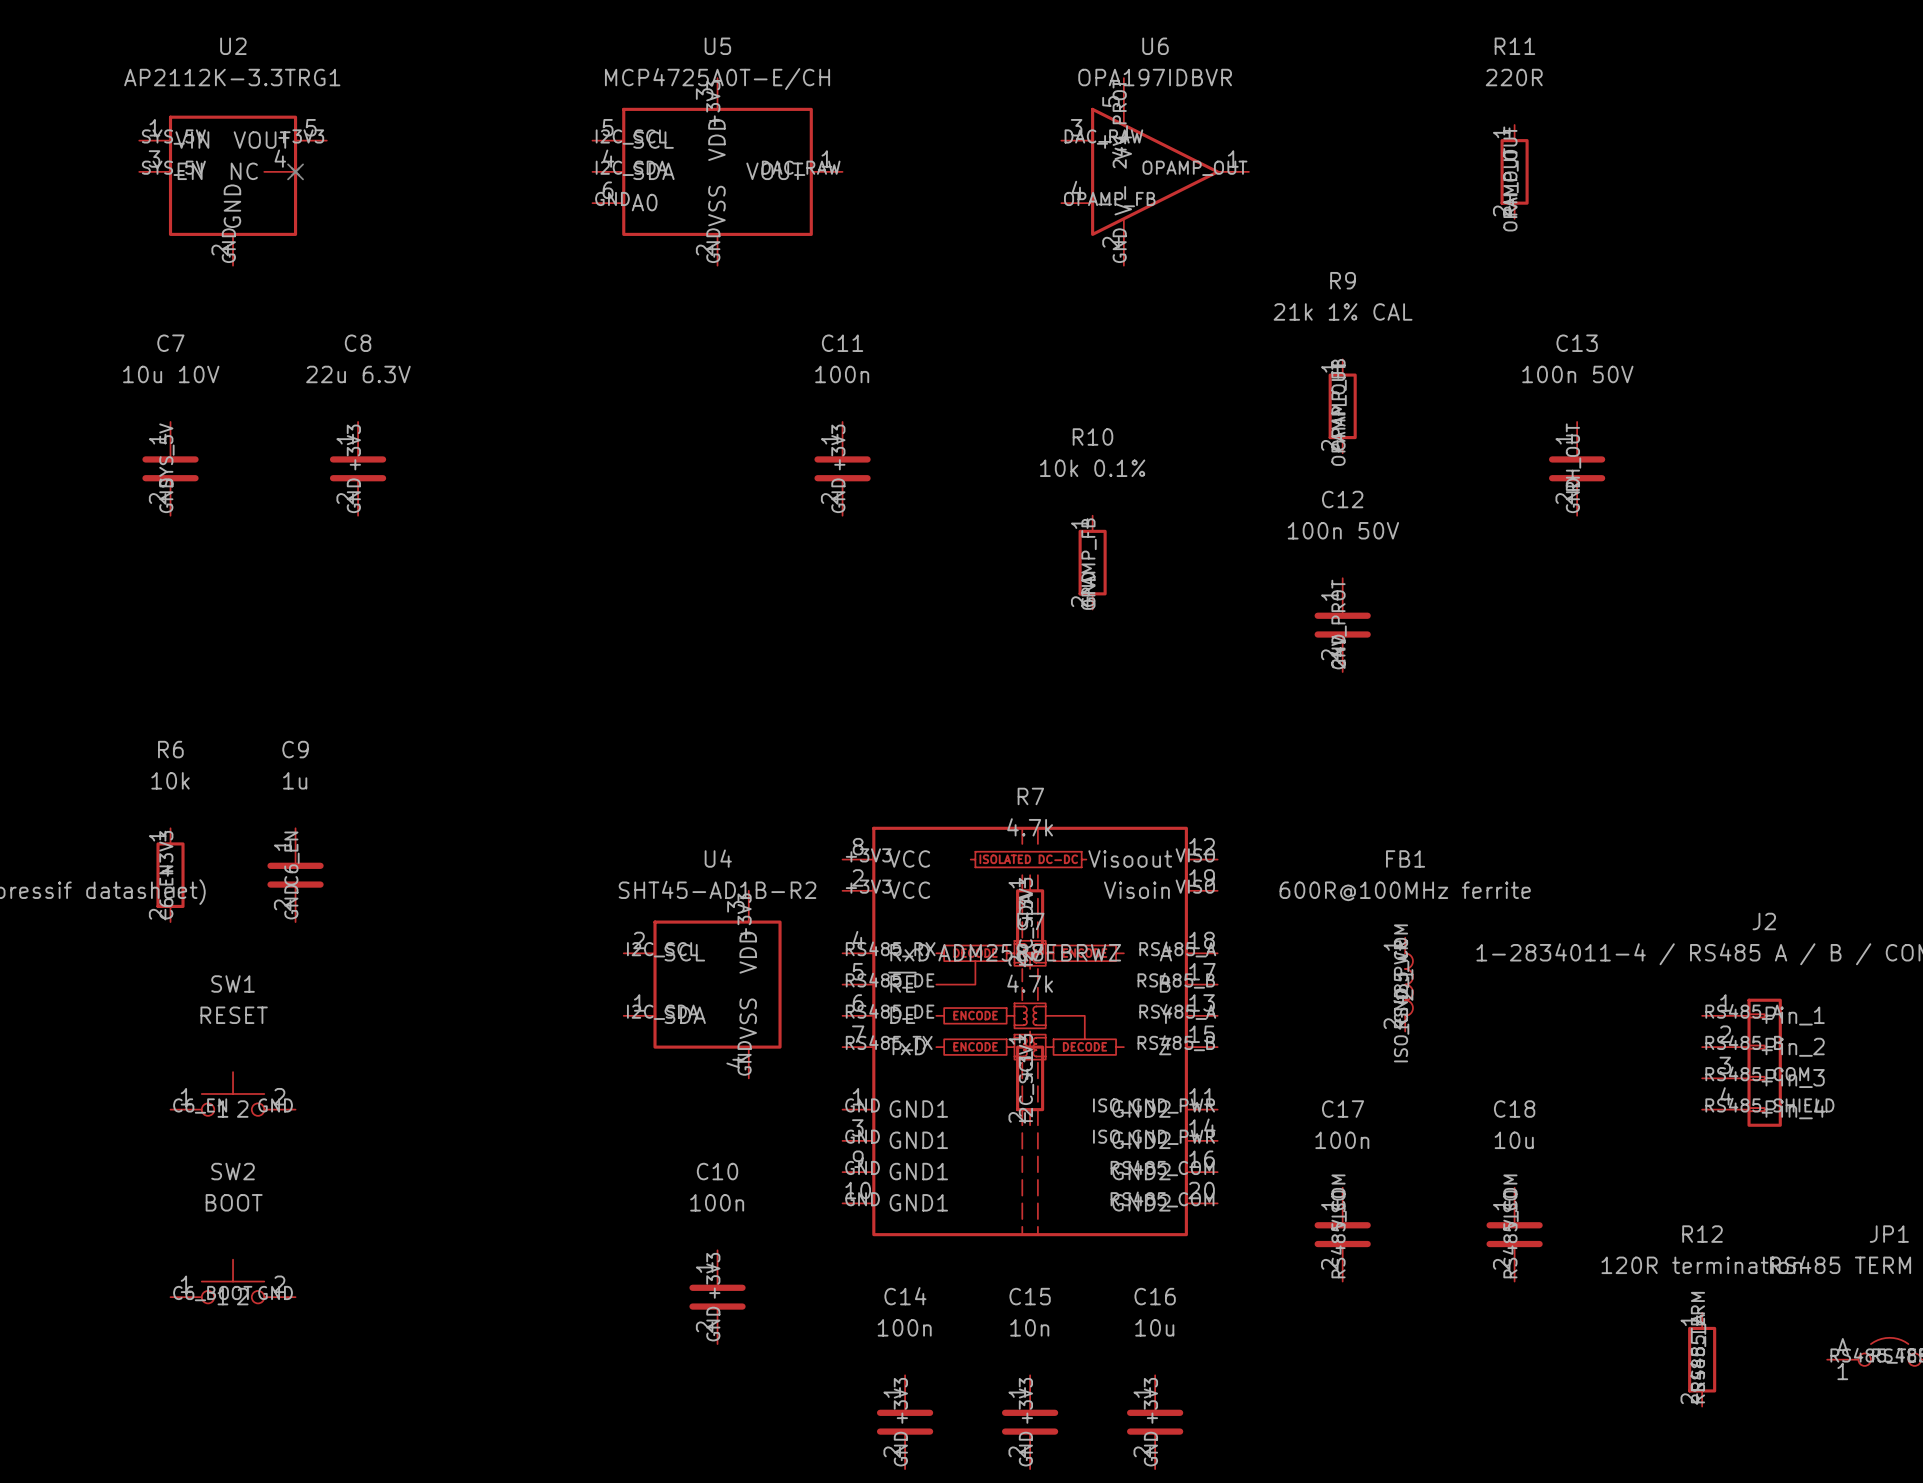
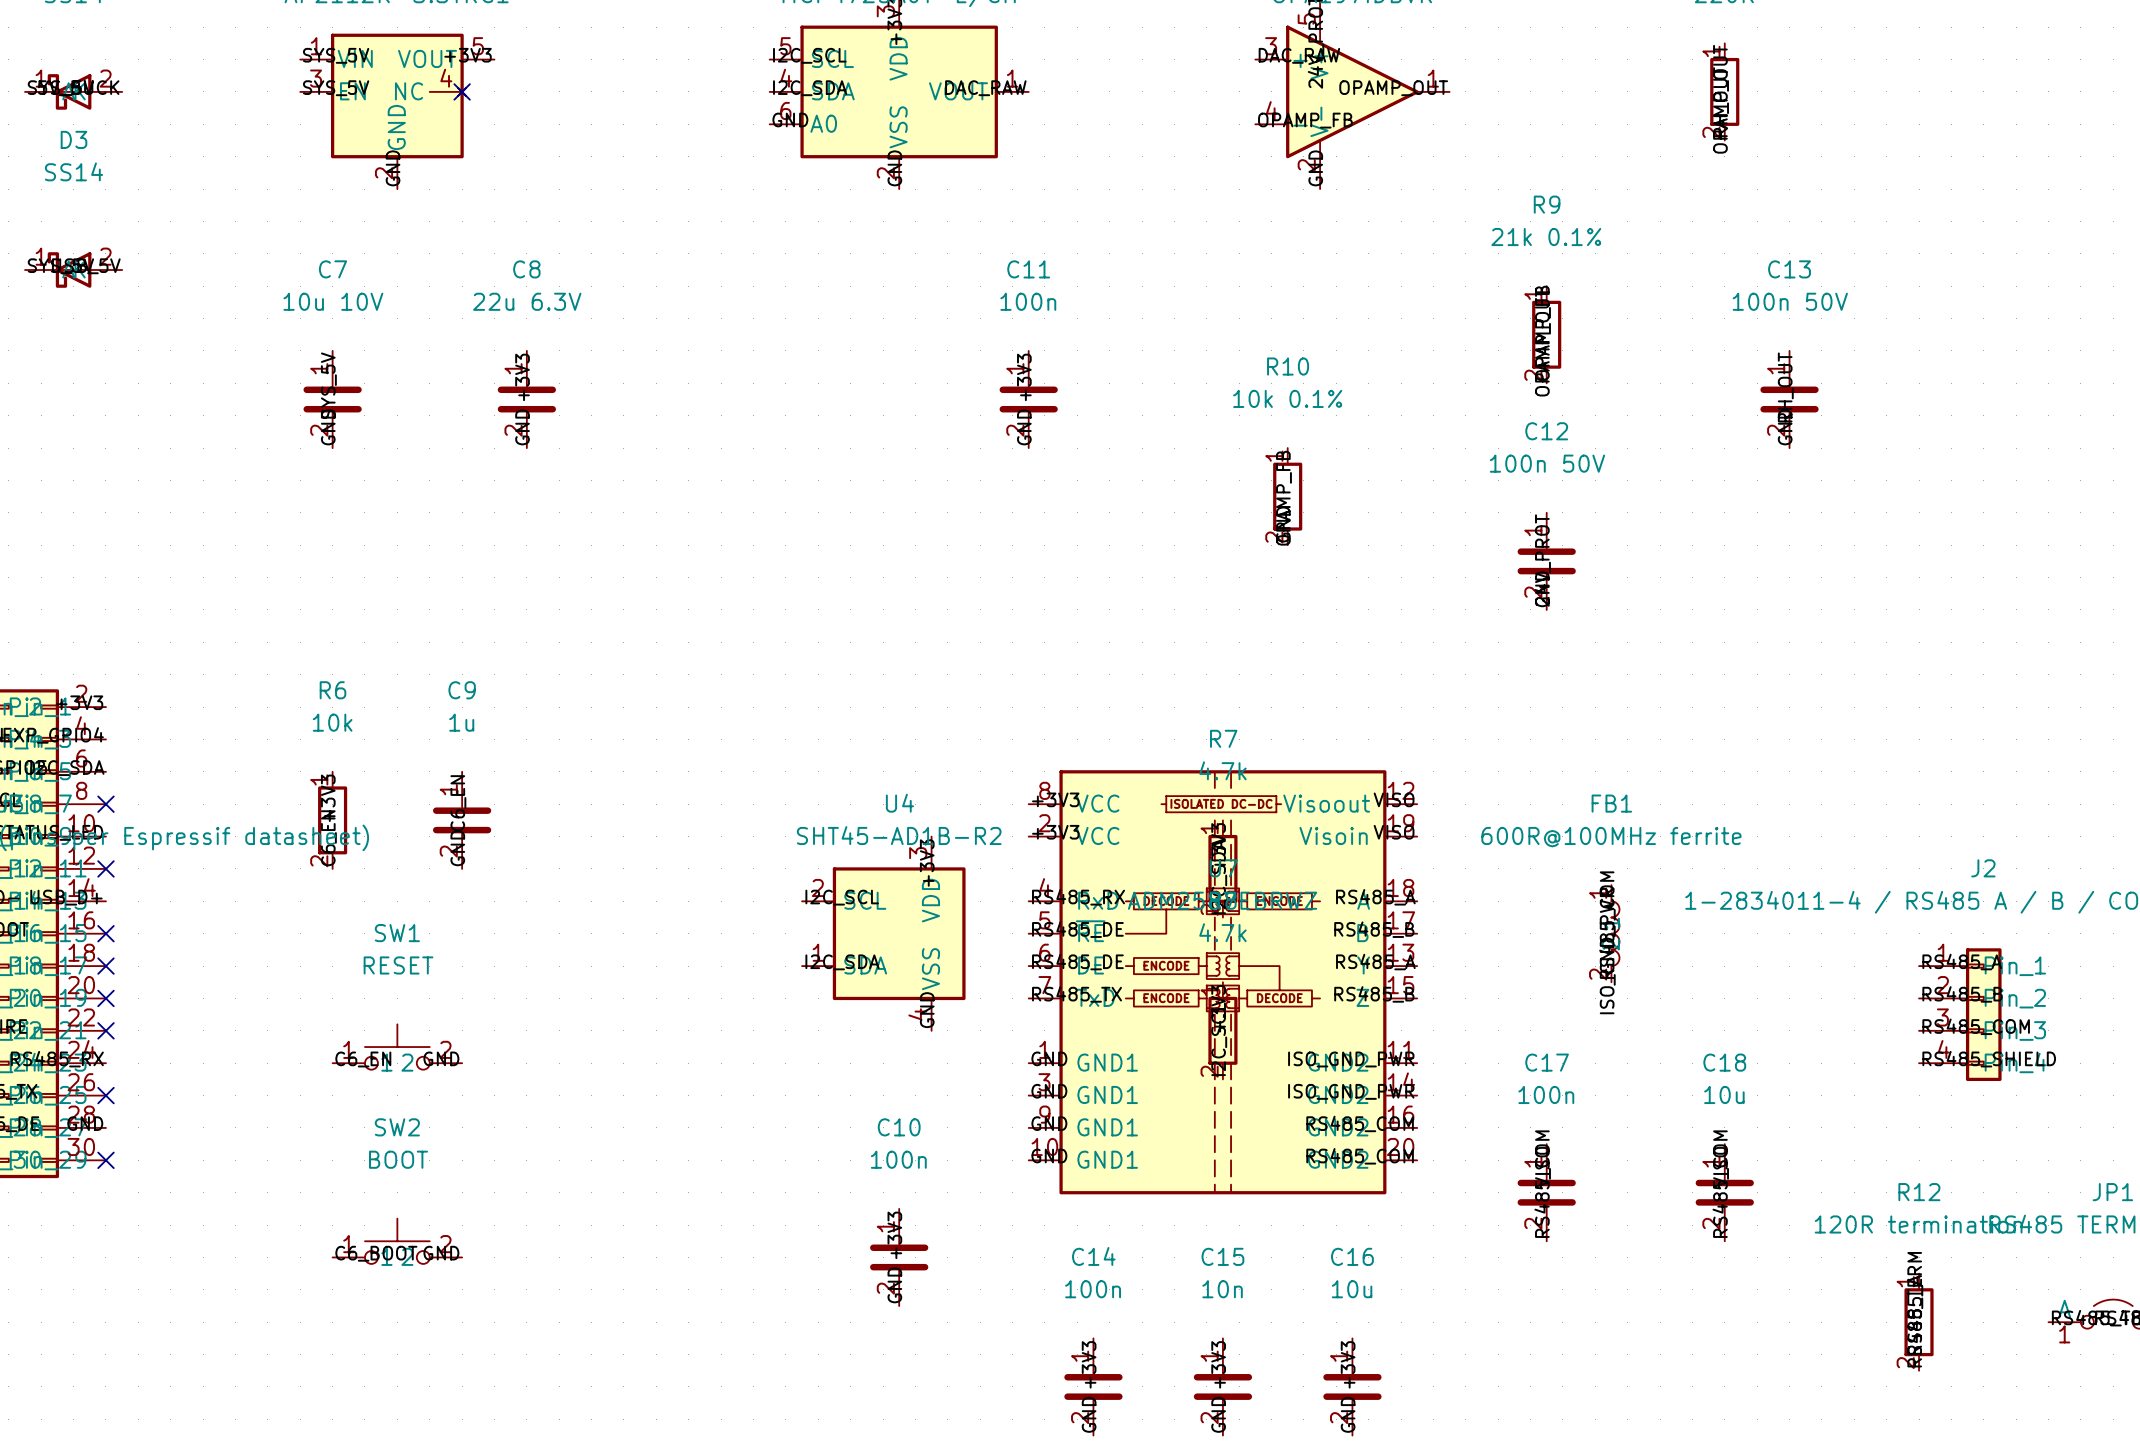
R9 value: 21k 1% CAL (1343, 311) -> 21k 0.1% (1546, 237)

